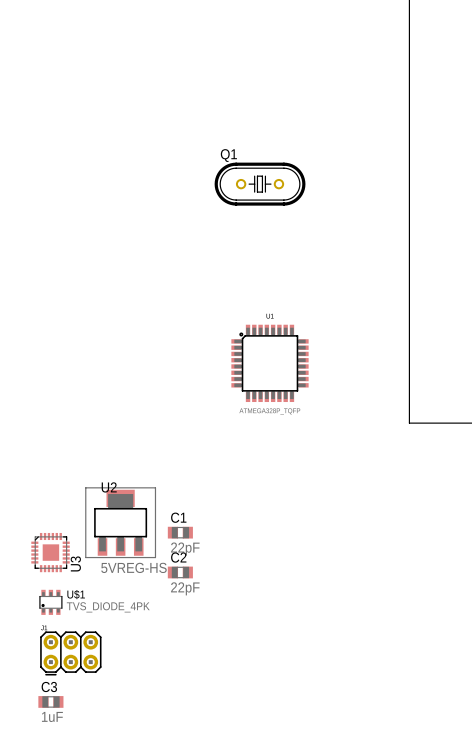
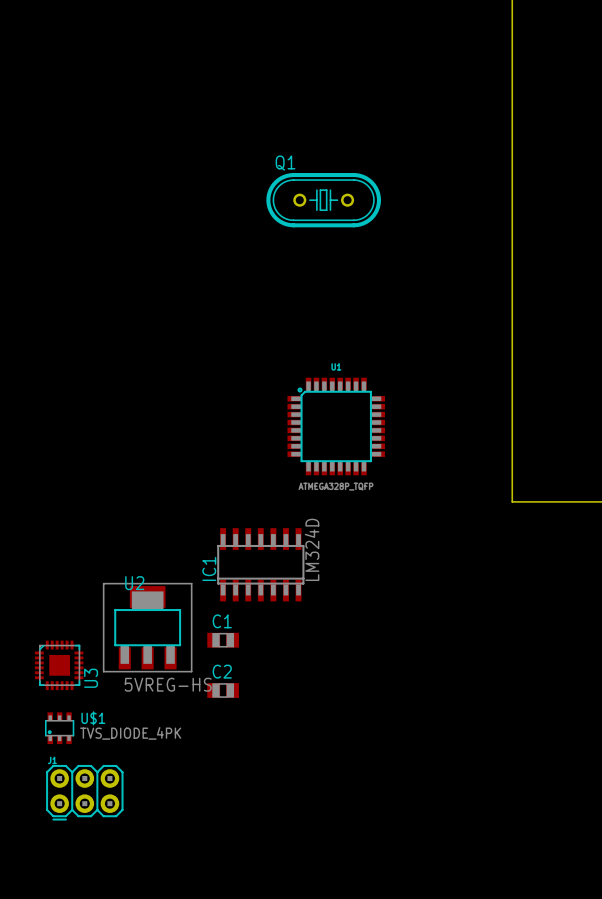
IC1: none -> LM324D (260, 564)
C1 value: 22pF (185, 549) -> none
C2 value: 22pF (185, 588) -> none
C3: 1uF (50, 701) -> none

